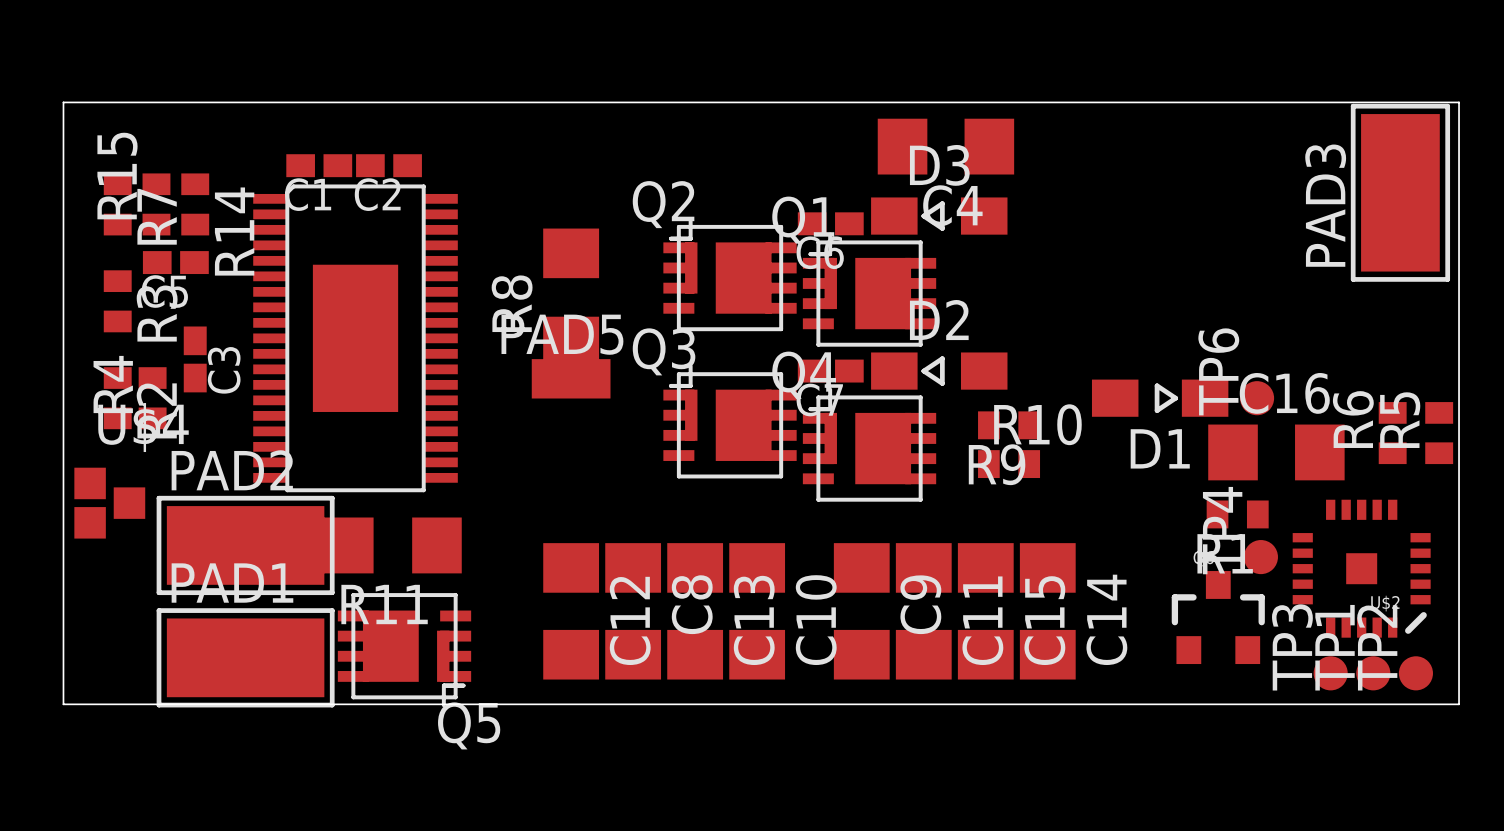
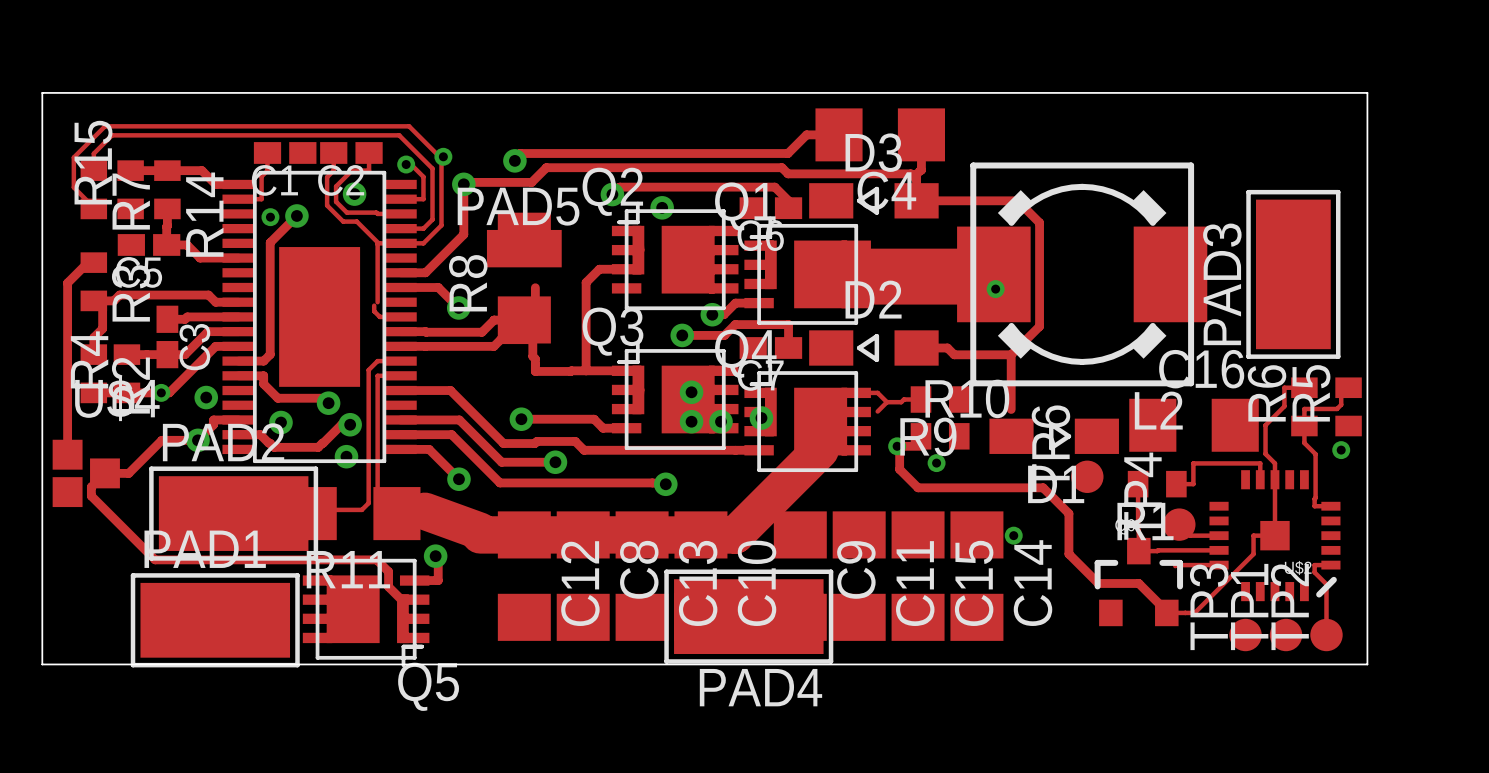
track: none -> (839, 134) (806, 134) (788, 153) (520, 153) (514, 160)
track: none -> (921, 134) (921, 170) (916, 174) (916, 200) (1017, 200) (1039, 222) (1039, 326) (1011, 354)
track: none -> (267, 152) (267, 170) (261, 176) (261, 199) (238, 199)
track: none -> (333, 152) (333, 170) (327, 177) (327, 205) (343, 221) (356, 221) (378, 243)
track: none -> (369, 152) (369, 170) (351, 170) (336, 186) (336, 201) (346, 212) (400, 213)
via: none -> (443, 156)
track: none -> (441, 158) (441, 225) (423, 243) (378, 243)
track: none -> (441, 158) (409, 126) (105, 126) (73, 157) (73, 187) (95, 208)
via: none -> (514, 160)
track: none -> (406, 164) (411, 164) (423, 176) (423, 199) (400, 199)
via: none -> (406, 164)
track: none -> (93, 170) (93, 153) (112, 135) (399, 135) (432, 168) (432, 219) (423, 228) (400, 228)
track: none -> (130, 170) (201, 170) (215, 184) (238, 184)
PAD3 position: (1400, 192) -> (1293, 274)
track: none -> (916, 179) (910, 173) (788, 173) (781, 167) (546, 167) (531, 182) (465, 182) (463, 184) (463, 234) (425, 272) (400, 272)
via: none -> (463, 184)
via: none -> (354, 194)
track: none -> (612, 194) (619, 187) (774, 187) (788, 200) (788, 208)
via: none -> (612, 194)
via: none -> (662, 207)
track: none -> (167, 208) (166, 244) (187, 244) (200, 258) (238, 258)
track: none -> (296, 215) (270, 242) (270, 354) (263, 361) (238, 361)
via: none -> (296, 215)
via: none -> (270, 217)
track: none -> (378, 243) (377, 302)
track: none -> (638, 250) (638, 269) (599, 269) (586, 282) (586, 370)
track: none -> (93, 262) (93, 267) (90, 260) (67, 283) (67, 454)
track: none -> (993, 274) (984, 276) (822, 276)
L2: none -> (1082, 274)
track: none -> (400, 287) (438, 287) (458, 307)
track: none -> (535, 287) (535, 320) (494, 320) (481, 332) (400, 331)
via: none -> (995, 289)
track: none -> (102, 300) (102, 328) (93, 337) (93, 354)
track: none -> (102, 300) (113, 300) (119, 295) (208, 295) (215, 302) (238, 302)
track: none -> (759, 303) (735, 303) (723, 314) (712, 314)
track: none -> (374, 305) (374, 311) (379, 316) (400, 316)
via: none -> (458, 307)
via: none -> (712, 314)
track: none -> (238, 316) (187, 316) (185, 319) (167, 319)
track: none -> (238, 331) (208, 331) (185, 354) (126, 354)
track: none -> (682, 335) (724, 335) (735, 324) (788, 324) (788, 348)
via: none -> (682, 335)
track: none -> (238, 346) (215, 346) (169, 392) (93, 392)
track: none -> (400, 346) (493, 346) (500, 339) (532, 339) (535, 371) (636, 370) (638, 389)
track: none -> (916, 348) (947, 348) (954, 354) (1011, 354)
PAD5 position: (571, 378) -> (524, 248)
track: none -> (1011, 354) (1011, 409)
track: none -> (400, 361) (377, 361) (368, 370) (368, 503) (361, 509) (318, 509) (315, 513) (233, 513)
D1 position: (1160, 398) -> (1054, 436)
TP6 position: (1257, 398) -> (1087, 476)
track: none -> (238, 375) (263, 375) (263, 384) (277, 398) (323, 398) (328, 403)
track: none -> (400, 375) (377, 375) (377, 502) (385, 509) (415, 509) (412, 495) (424, 511) (480, 531) (480, 534) (656, 534) (645, 537) (653, 534) (735, 535) (820, 450) (856, 450)
track: none -> (1304, 387) (1284, 387) (1284, 406) (1265, 425) (1265, 453) (1274, 463) (1274, 535) (1253, 535) (1253, 554) (1194, 612) (1166, 612) (1138, 583) (1098, 583) (1068, 554) (1068, 513) (1043, 487) (918, 487) (899, 469) (899, 448) (897, 446) (921, 446) (921, 436)
track: none -> (1341, 387) (1341, 404) (1337, 408) (1304, 408) (1304, 443) (1315, 454) (1314, 506) (1330, 506)
track: none -> (400, 390) (450, 390) (503, 443) (575, 441) (584, 450) (759, 450)
via: none -> (691, 392)
via: none -> (161, 392)
track: none -> (856, 392) (877, 392) (886, 402)
via: none -> (206, 397)
track: none -> (921, 399) (886, 402)
track: none -> (886, 402) (877, 411)
via: none -> (328, 403)
via: none -> (761, 418)
track: none -> (238, 419) (213, 419) (213, 424) (197, 440) (161, 440) (128, 473) (104, 473) (91, 487) (91, 496) (155, 559) (376, 559) (388, 571) (388, 586) (401, 599) (414, 599)
track: none -> (400, 419) (459, 419) (501, 462) (555, 462)
track: none -> (521, 419) (594, 419) (603, 428) (626, 428)
via: none -> (521, 419)
via: none -> (691, 421)
via: none -> (720, 421)
via: none -> (281, 422)
track: none -> (350, 424) (341, 424) (318, 447) (274, 447) (260, 434) (238, 434)
via: none -> (350, 424)
track: none -> (400, 434) (451, 434) (499, 482) (665, 484)
via: none -> (197, 440)
via: none -> (897, 446)
track: none -> (400, 449) (429, 449) (458, 479)
via: none -> (1341, 450)
via: none -> (346, 456)
via: none -> (555, 462)
via: none -> (936, 463)
via: none -> (458, 479)
track: none -> (1260, 479) (1260, 463) (1193, 463) (1193, 484) (1176, 484)
via: none -> (665, 484)
track: none -> (1138, 484) (1138, 551) (1219, 550)
PAD2 position: (245, 545) -> (233, 513)
track: none -> (1179, 524) (1190, 535) (1219, 535)
via: none -> (1013, 535)
track: none -> (435, 556) (438, 558) (438, 580) (414, 580)
via: none -> (435, 556)
track: none -> (1219, 565) (1175, 566)
track: none -> (1330, 565) (1314, 565) (1314, 572) (1326, 584) (1326, 635)
PAD4: none -> (748, 616)

